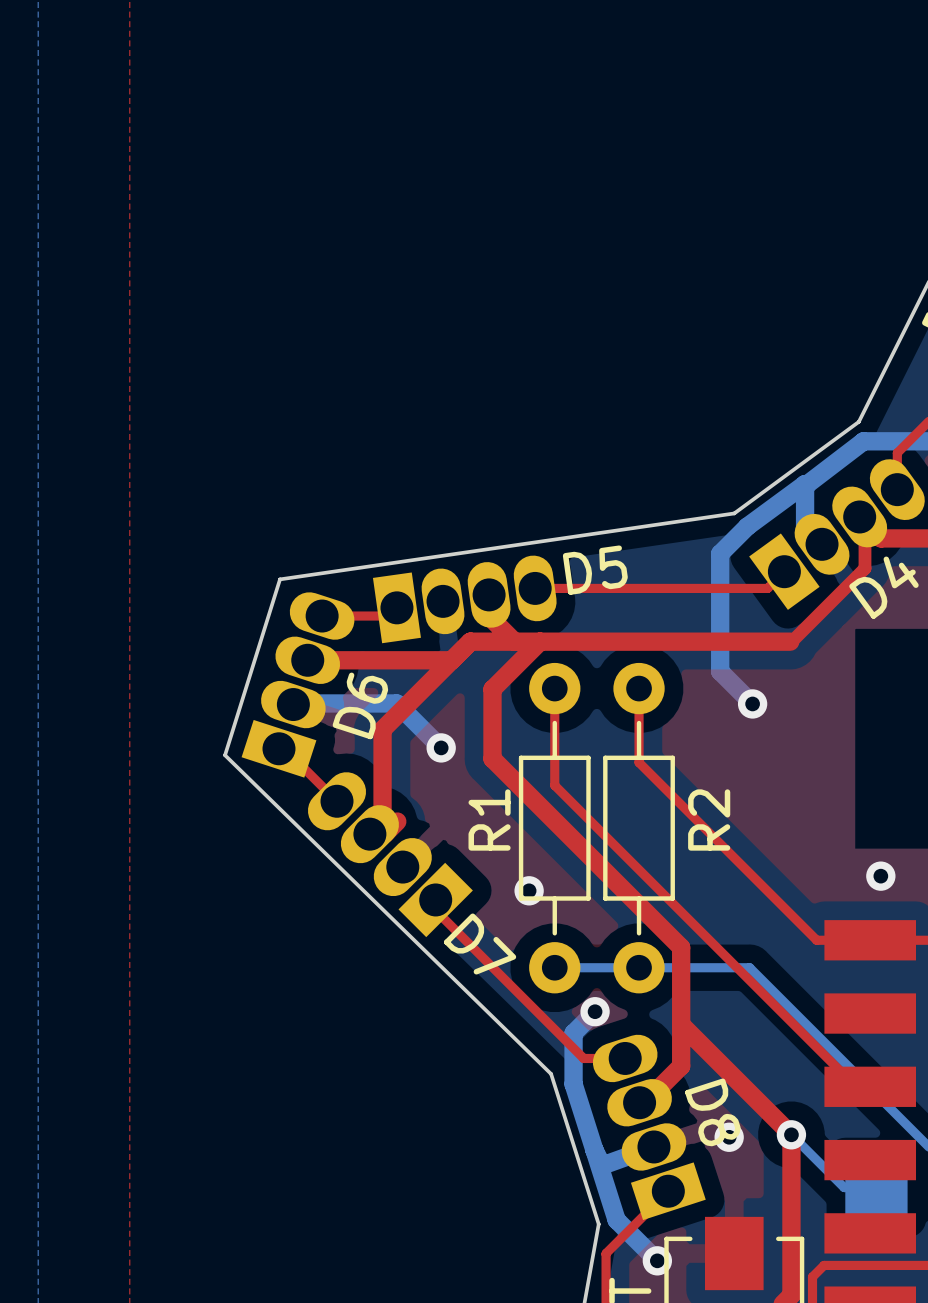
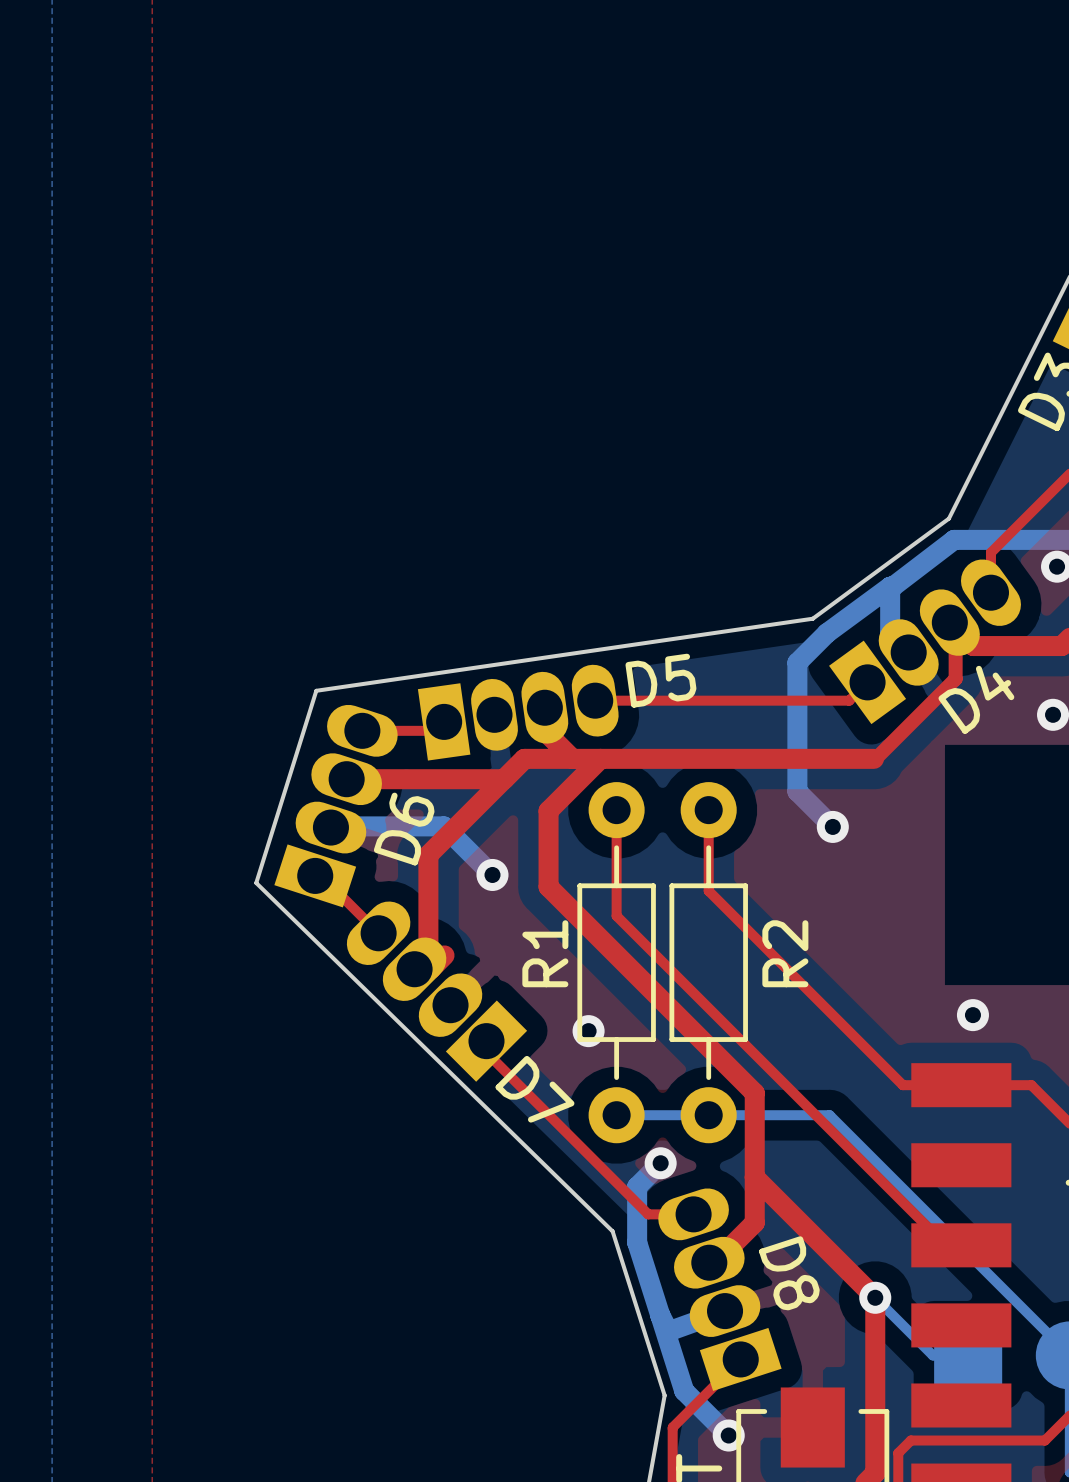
via: (729, 1137) -> none

